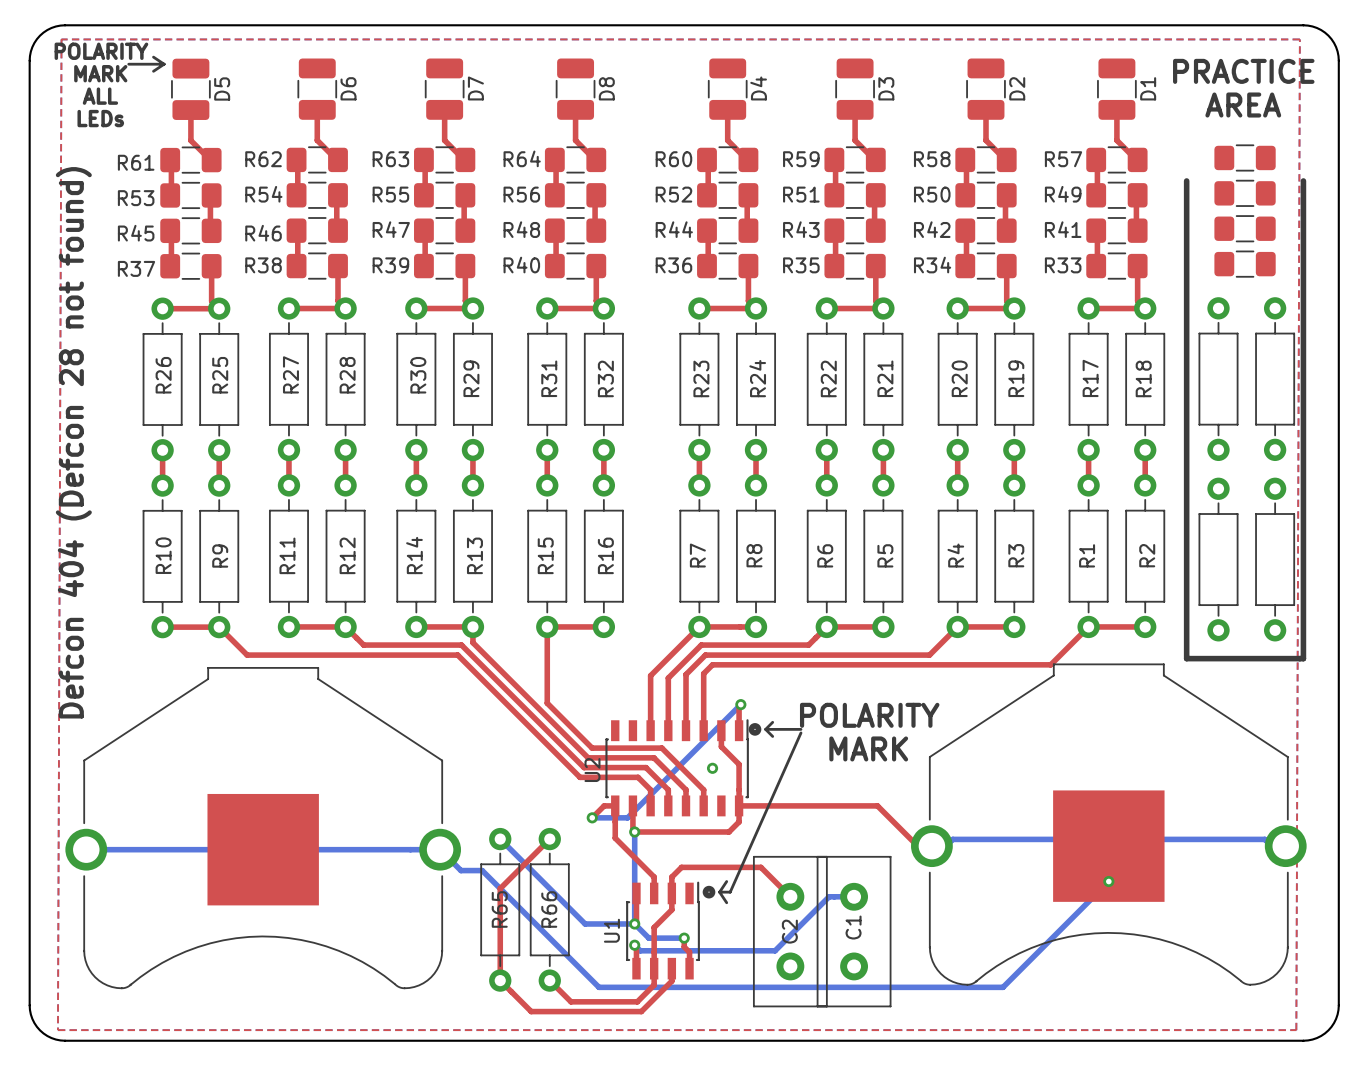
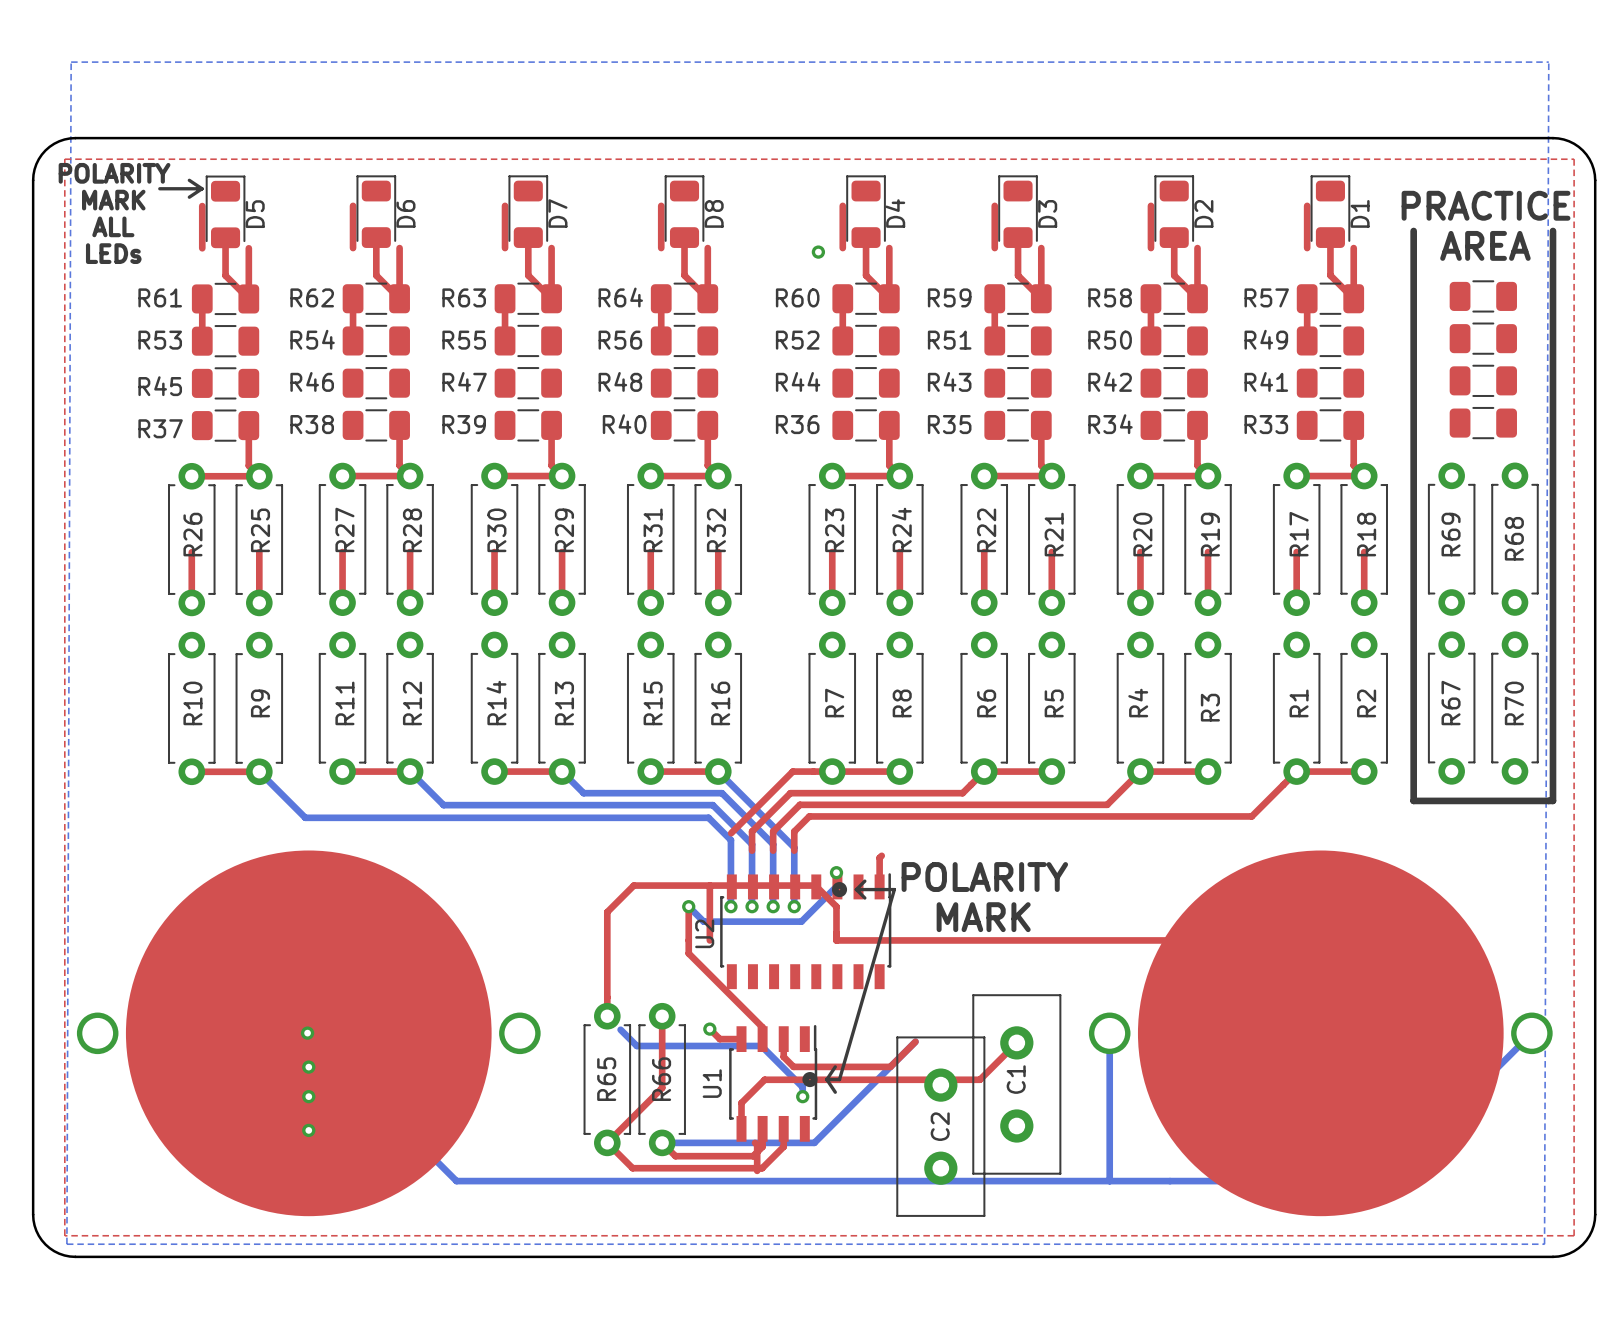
top zone outline: (61, 39) (1299, 39) (1296, 1030) (57, 1030) (61, 39) -> (64, 159) (64, 1235) (1574, 1235) (1574, 159) (64, 159)
text position: POLARITY (101, 51) -> POLARITY (114, 173)
line: (153, 57) (164, 64) -> (189, 180) (202, 188)
D5 footprint: [171, 58, 211, 120] -> [205, 175, 246, 249]
D6 footprint: [297, 58, 338, 120] -> [356, 175, 397, 248]
D7 footprint: [424, 58, 465, 120] -> [508, 175, 549, 248]
D8 footprint: [555, 58, 596, 120] -> [664, 175, 705, 248]
D4 footprint: [707, 58, 748, 120] -> [846, 175, 886, 248]
D3 footprint: [835, 58, 875, 120] -> [998, 175, 1038, 248]
D2 footprint: [966, 58, 1006, 120] -> [1154, 175, 1195, 248]
D1 footprint: [1097, 58, 1137, 120] -> [1310, 175, 1351, 248]
line: (128, 64) (164, 64) -> (159, 188) (202, 188)
line: (164, 64) (153, 71) -> (202, 188) (189, 197)
text position: PRACTICE (1243, 71) -> PRACTICE (1486, 205)
text position: MARK (100, 73) -> MARK (113, 200)
text position: ALL (100, 96) -> ALL (113, 226)
text position: AREA (1243, 105) -> AREA (1485, 245)
top track: (190, 108) (190, 140) (210, 160) -> (225, 237) (225, 275) (248, 298)
top track: (317, 108) (317, 140) (336, 159) -> (376, 237) (376, 275) (399, 298)
top track: (444, 108) (444, 140) (464, 159) -> (528, 237) (528, 275) (551, 298)
top track: (575, 108) (575, 140) (595, 159) -> (684, 237) (684, 275) (707, 298)
top track: (727, 108) (727, 140) (747, 159) -> (866, 237) (866, 275) (889, 298)
top track: (855, 108) (855, 140) (874, 159) -> (1018, 237) (1018, 275) (1041, 298)
top track: (986, 108) (986, 140) (1005, 159) -> (1174, 237) (1174, 275) (1197, 298)
top track: (1116, 108) (1116, 140) (1136, 159) -> (1330, 237) (1330, 275) (1353, 298)
text position: LEDs (100, 118) -> LEDs (113, 253)
board edge: (29, 138) (30, 51) (36, 39) (43, 32) (51, 27) (65, 25) (1308, 25) (1324, 32) (1334, 42) (1337, 51) (1338, 138) -> (33, 180) (36, 164) (45, 150) (59, 141) (75, 138) (1552, 138) (1569, 141) (1582, 150) (1591, 164) (1595, 180)
R61 footprint: [160, 146, 222, 174] -> [191, 282, 260, 316]
R62 footprint: [286, 146, 348, 174] -> [342, 282, 410, 315]
R63 footprint: [414, 146, 476, 174] -> [494, 282, 562, 315]
R64 footprint: [544, 146, 607, 174] -> [650, 282, 719, 315]
R60 footprint: [697, 146, 759, 174] -> [832, 282, 900, 315]
R59 footprint: [824, 146, 886, 174] -> [984, 282, 1052, 315]
R58 footprint: [955, 146, 1017, 174] -> [1140, 282, 1208, 315]
R57 footprint: [1086, 146, 1148, 174] -> [1296, 282, 1365, 315]
part: (1245, 157) -> none
R53 footprint: [160, 181, 222, 209] -> [191, 325, 260, 358]
R54 footprint: [286, 181, 348, 209] -> [342, 324, 410, 358]
R55 footprint: [414, 181, 476, 209] -> [494, 324, 562, 358]
R56 footprint: [544, 181, 607, 209] -> [650, 324, 719, 358]
R52 footprint: [697, 181, 759, 209] -> [832, 324, 900, 358]
R51 footprint: [824, 181, 886, 209] -> [984, 324, 1052, 358]
R50 footprint: [955, 181, 1017, 209] -> [1140, 324, 1208, 358]
R49 footprint: [1086, 181, 1148, 209] -> [1296, 324, 1365, 358]
part: (1245, 193) -> none
via: none -> (818, 252)
part footprint: [1214, 215, 1276, 243] -> [1449, 280, 1517, 313]
R45 footprint: [160, 217, 222, 245] -> [191, 367, 260, 400]
R46 footprint: [286, 217, 348, 245] -> [342, 367, 410, 400]
R47 footprint: [414, 217, 476, 245] -> [494, 367, 562, 400]
R48 footprint: [544, 217, 607, 245] -> [650, 367, 719, 400]
R44 footprint: [697, 217, 759, 245] -> [832, 367, 900, 400]
R43 footprint: [824, 217, 886, 245] -> [984, 367, 1052, 400]
R42 footprint: [955, 217, 1017, 245] -> [1140, 367, 1208, 400]
R41 footprint: [1086, 217, 1148, 245] -> [1296, 367, 1365, 400]
part footprint: [1214, 250, 1276, 278] -> [1449, 322, 1517, 355]
R37 footprint: [160, 252, 222, 280] -> [191, 409, 260, 442]
R38 footprint: [286, 252, 348, 280] -> [342, 409, 410, 442]
R39 footprint: [414, 252, 476, 280] -> [494, 409, 562, 442]
R40 footprint: [544, 252, 607, 280] -> [650, 409, 719, 442]
R36 footprint: [697, 252, 759, 280] -> [832, 409, 900, 442]
R35 footprint: [824, 252, 886, 280] -> [984, 409, 1052, 442]
R34 footprint: [955, 252, 1017, 280] -> [1140, 409, 1208, 442]
R33 footprint: [1086, 252, 1148, 280] -> [1296, 409, 1365, 442]
top track: (211, 266) (211, 301) (219, 308) (162, 308) -> none
top track: (338, 266) (338, 300) (345, 308) (288, 308) -> none
top track: (465, 266) (465, 300) (472, 308) (416, 308) -> none
top track: (596, 266) (596, 300) (603, 308) (547, 308) -> none
top track: (748, 266) (748, 300) (756, 308) (699, 308) -> none
top track: (875, 266) (875, 300) (883, 308) (826, 308) -> none
top track: (1006, 266) (1006, 300) (1014, 308) (957, 308) -> none
top track: (1137, 266) (1137, 300) (1145, 308) (1088, 308) -> none
R26 footprint: [142, 297, 183, 462] -> [168, 462, 216, 617]
R25 footprint: [199, 297, 240, 462] -> [235, 462, 284, 617]
R27 footprint: [269, 297, 309, 462] -> [318, 462, 367, 617]
R28 footprint: [325, 297, 366, 462] -> [386, 462, 434, 617]
R30 footprint: [396, 297, 437, 462] -> [470, 462, 519, 617]
R29 footprint: [453, 297, 493, 462] -> [538, 462, 586, 617]
R31 footprint: [527, 297, 568, 462] -> [626, 462, 675, 617]
R32 footprint: [583, 297, 624, 462] -> [694, 462, 743, 617]
R23 footprint: [679, 297, 720, 462] -> [808, 462, 857, 617]
R24 footprint: [736, 297, 776, 462] -> [876, 462, 924, 617]
R22 footprint: [806, 297, 847, 462] -> [960, 462, 1009, 617]
R21 footprint: [863, 297, 904, 462] -> [1028, 462, 1076, 617]
R20 footprint: [937, 297, 978, 462] -> [1116, 462, 1165, 617]
R19 footprint: [994, 297, 1035, 462] -> [1184, 462, 1232, 617]
R17 footprint: [1068, 297, 1109, 462] -> [1272, 462, 1321, 617]
R18 footprint: [1125, 297, 1166, 462] -> [1340, 462, 1388, 617]
part: none -> (1483, 380)
part: none -> (1483, 423)
top track: none -> (399, 425) (399, 465) (410, 476) (342, 476)
top track: none -> (551, 425) (551, 465) (562, 476) (494, 476)
top track: none -> (707, 425) (707, 465) (718, 476) (650, 476)
top track: none -> (889, 425) (889, 465) (899, 476) (832, 476)
top track: none -> (1041, 425) (1041, 465) (1051, 476) (984, 476)
top track: none -> (1197, 425) (1197, 465) (1208, 476) (1140, 476)
top track: none -> (1353, 425) (1353, 465) (1364, 476) (1296, 476)
top track: none -> (248, 425) (248, 465) (259, 476) (191, 476)
part: (1218, 379) -> none
part: (1275, 379) -> none
R69: none -> (1451, 539)
R68: none -> (1514, 539)
text: Defcon 404 (Defcon 28 not found) (73, 442) -> none
R10 footprint: [142, 474, 183, 639] -> [168, 631, 216, 786]
R9 footprint: [199, 474, 240, 639] -> [235, 631, 284, 786]
R11 footprint: [269, 474, 309, 639] -> [318, 631, 367, 785]
R12 footprint: [325, 474, 366, 639] -> [386, 631, 434, 785]
R14 footprint: [396, 474, 437, 639] -> [470, 631, 519, 785]
R13 footprint: [453, 474, 493, 639] -> [538, 631, 586, 785]
R15 footprint: [527, 474, 568, 639] -> [626, 631, 675, 785]
R16 footprint: [583, 474, 624, 639] -> [694, 631, 743, 785]
R7 footprint: [679, 474, 720, 639] -> [808, 631, 857, 785]
R8 footprint: [736, 474, 776, 639] -> [876, 631, 924, 785]
R6 footprint: [806, 474, 847, 639] -> [960, 631, 1009, 785]
R5 footprint: [863, 474, 904, 639] -> [1028, 631, 1076, 785]
R4 footprint: [937, 474, 978, 639] -> [1116, 631, 1165, 785]
R3 footprint: [994, 474, 1035, 639] -> [1184, 631, 1232, 785]
R1 footprint: [1068, 474, 1109, 639] -> [1272, 631, 1321, 785]
R2 footprint: [1125, 474, 1166, 639] -> [1340, 631, 1388, 785]
part: (1218, 559) -> none
part: (1275, 559) -> none
R67: none -> (1451, 708)
R70: none -> (1514, 708)
top track: (288, 626) (345, 626) (363, 645) (461, 645) (584, 767) (646, 767) (668, 789) (668, 805) -> none
top track: (416, 626) (472, 626) (472, 642) (588, 757) (653, 757) (686, 789) (686, 805) -> none
top track: (603, 626) (547, 626) (547, 703) (592, 748) (661, 748) (703, 789) (703, 805) -> none
top track: (756, 626) (699, 626) (650, 675) (650, 730) -> none
top track: (883, 626) (826, 626) (808, 645) (701, 645) (668, 678) (668, 730) -> none
top track: (1014, 626) (957, 626) (929, 655) (705, 655) (686, 674) (686, 730) -> none
top track: (1145, 626) (1088, 626) (1050, 664) (712, 664) (703, 673) (703, 730) -> none
top track: (162, 627) (219, 627) (247, 655) (457, 655) (580, 777) (638, 777) (650, 789) (650, 805) -> none
top track: none -> (191, 771) (259, 771)
bottom track: none -> (259, 771) (305, 817) (708, 817) (730, 840) (730, 906)
top track: none -> (342, 771) (410, 771)
bottom track: none -> (410, 771) (443, 805) (712, 805) (752, 844) (752, 906)
top track: none -> (494, 771) (562, 771)
bottom track: none -> (562, 771) (583, 793) (722, 793) (773, 844) (773, 906)
top track: none -> (650, 771) (718, 771)
bottom track: none -> (718, 771) (794, 847) (794, 906)
top track: none -> (899, 771) (792, 771) (731, 833)
top track: none -> (1051, 771) (984, 771) (962, 793) (790, 793) (752, 831) (752, 850)
top track: none -> (1208, 771) (1140, 771) (1107, 804) (799, 804) (773, 831) (773, 850)
top track: none -> (1364, 771) (1296, 771) (1251, 816) (809, 816) (794, 831) (794, 850)
bottom track: (740, 704) (627, 817) (592, 817) -> none
via: (740, 704) -> none
text position: POLARITY (869, 715) -> POLARITY (984, 877)
bottom track: none -> (836, 872) (836, 886) (801, 921) (703, 921) (688, 906)
via: none -> (836, 872)
line: (772, 722) (765, 729) (772, 736) -> none
line: none -> (864, 881) (856, 889)
top track: none -> (709, 885) (709, 940)
drawing position: (755, 729) -> (839, 889)
line: (769, 729) (801, 729) -> none
top track: (721, 730) (721, 746) (739, 764) (739, 821) (729, 831) (634, 831) (632, 830) (632, 805) -> none
line: none -> (856, 889) (864, 898)
line: none -> (856, 889) (894, 889) (839, 1079) (826, 1079)
line: (801, 732) (730, 892) (719, 892) -> none
top track: none -> (688, 906) (688, 953) (762, 1027) (762, 1039)
via: none -> (688, 906)
via: none -> (730, 906)
via: none -> (752, 906)
via: none -> (773, 906)
via: none -> (794, 906)
text position: MARK (868, 748) -> MARK (983, 917)
via: (712, 768) -> none
top track: (739, 805) (877, 805) (931, 860) -> none
top track: (592, 817) (604, 805) (615, 805) (615, 838) (654, 877) (654, 893) -> none
via: (592, 817) -> none
part: (1108, 824) -> none
R65 footprint: [480, 827, 521, 992] -> [583, 1002, 632, 1157]
R66 footprint: [529, 827, 570, 992] -> [638, 1002, 686, 1157]
part: (263, 828) -> none
bottom track: (634, 831) (634, 923) -> none
via: (634, 831) -> none
bottom track: (500, 839) (585, 923) (634, 923) -> none
top track: none -> (607, 1016) (607, 912) (633, 885) (815, 885) (836, 906) (836, 940) (1288, 940) (1381, 1033)
top track: (549, 839) (500, 888) (500, 980) (531, 1011) (641, 1011) (671, 981) (671, 968) -> none
top track: none -> (662, 1016) (662, 1088) (607, 1142) (632, 1168) (762, 1168) (783, 1146) (783, 1128)
bottom track: (86, 849) (440, 849) (460, 870) (482, 870) (598, 987) (1003, 987) (1108, 881) -> none
top track: none -> (709, 1029) (719, 1039) (741, 1039)
via: none -> (709, 1029)
bottom track: none -> (620, 1029) (636, 1045) (761, 1045) (802, 1087) (802, 1096)
via: none -> (307, 1033)
bottom track: none -> (308, 1033) (456, 1181) (1384, 1181) (1531, 1033)
part: none -> (308, 1033)
bottom track: none -> (1109, 1033) (1109, 1181)
part: none -> (1320, 1033)
top track: none -> (783, 1039) (783, 1056) (793, 1066) (890, 1066) (915, 1041)
bottom track: none -> (915, 1041) (814, 1142) (662, 1142)
bottom track: (931, 860) (952, 839) (1264, 839) (1285, 860) -> none
top track: none -> (1016, 1042) (979, 1079) (764, 1079) (741, 1102) (741, 1128)
via: none -> (308, 1067)
line: (726, 881) (719, 892) -> (835, 1066) (826, 1079)
via: (1108, 881) -> none
drawing position: (709, 892) -> (809, 1079)
line: (719, 892) (726, 902) -> (826, 1079) (835, 1092)
top track: (636, 893) (636, 922) (634, 923) -> none
top track: (790, 896) (760, 867) (681, 867) (671, 877) (671, 909) (654, 927) (654, 985) (637, 1001) (571, 1001) (549, 980) -> none
bottom track: (854, 896) (829, 896) (775, 950) (640, 950) (634, 945) -> none
via: none -> (308, 1096)
via: none -> (802, 1096)
bottom track: (634, 923) (648, 938) (684, 938) -> none
via: (634, 923) -> none
U1 position: (663, 930) -> (773, 1083)
C1 position: (854, 931) -> (1016, 1084)
top track: none -> (762, 1128) (762, 1146) (753, 1156) (675, 1156) (662, 1142)
via: none -> (308, 1130)
top track: (684, 938) (684, 947) (689, 952) (689, 968) -> none
via: (684, 938) -> none
via: (634, 945) -> none

